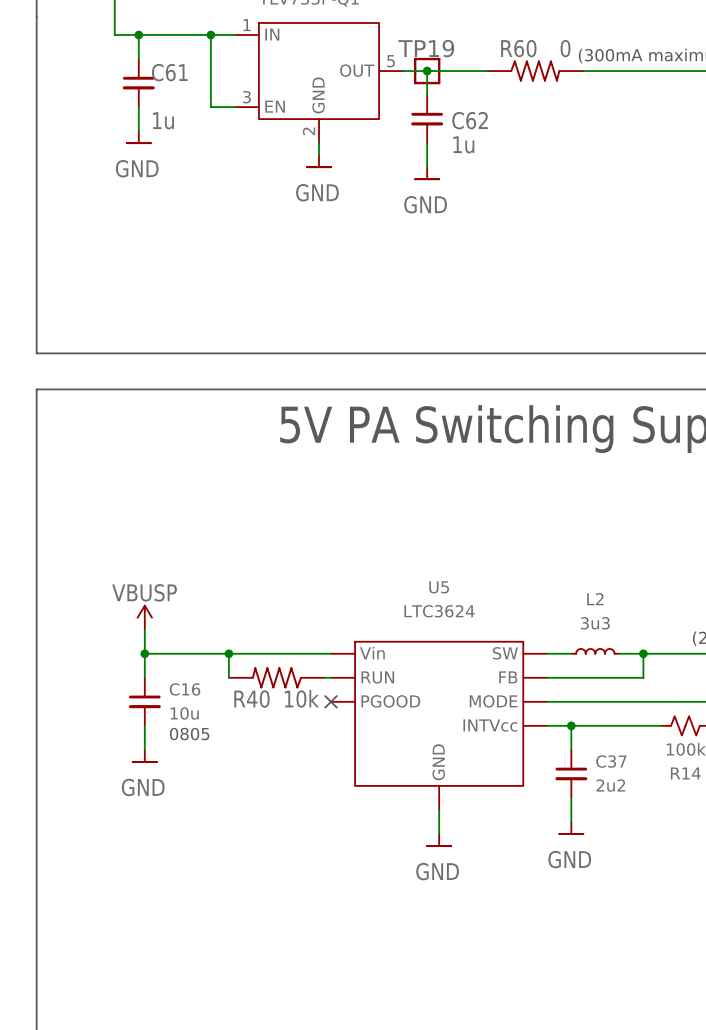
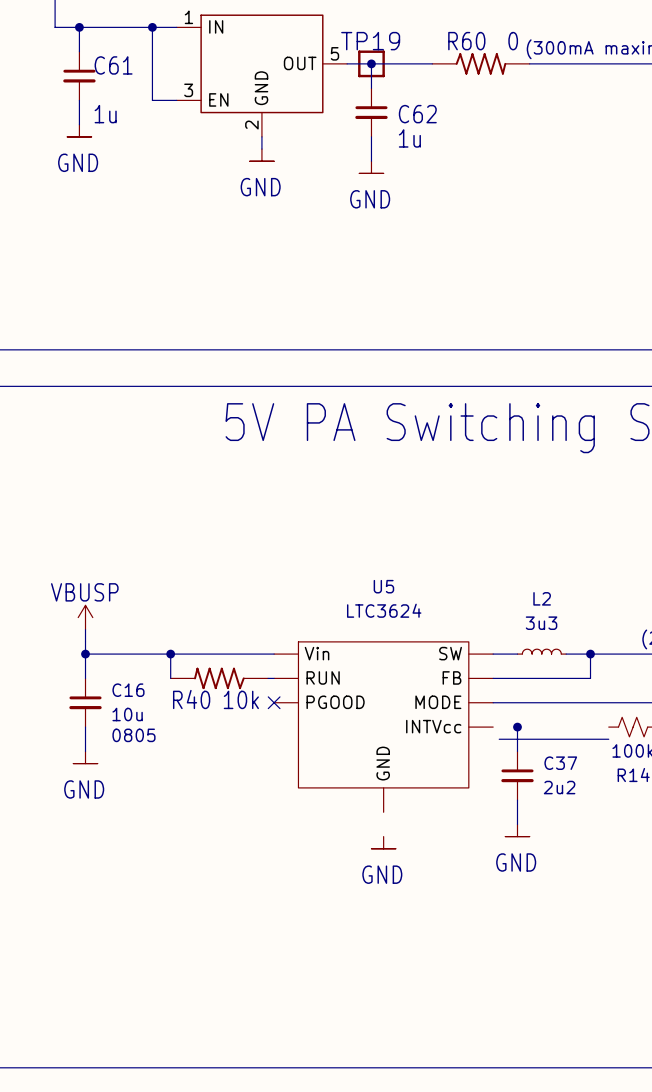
wire: (547, 725) (661, 725) -> none
wire: none -> (499, 739) (608, 739)
wire: (439, 809) (439, 833) -> none

